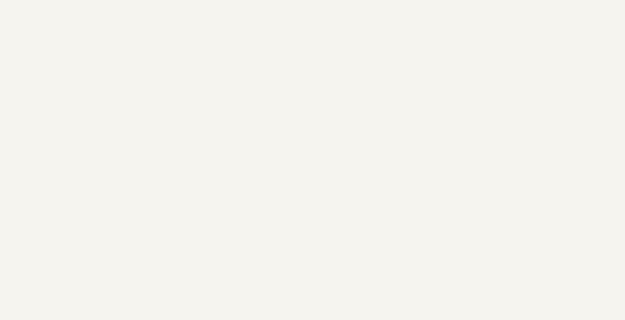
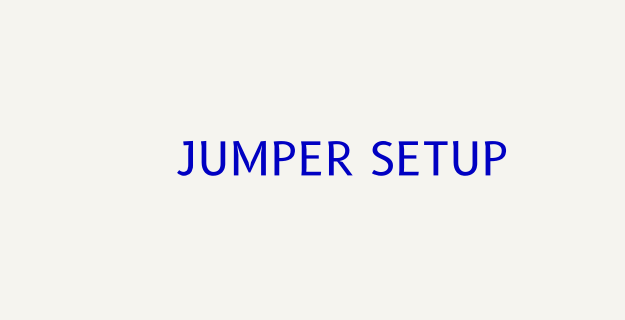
text: none -> JUMPER SETUP (341, 158)

